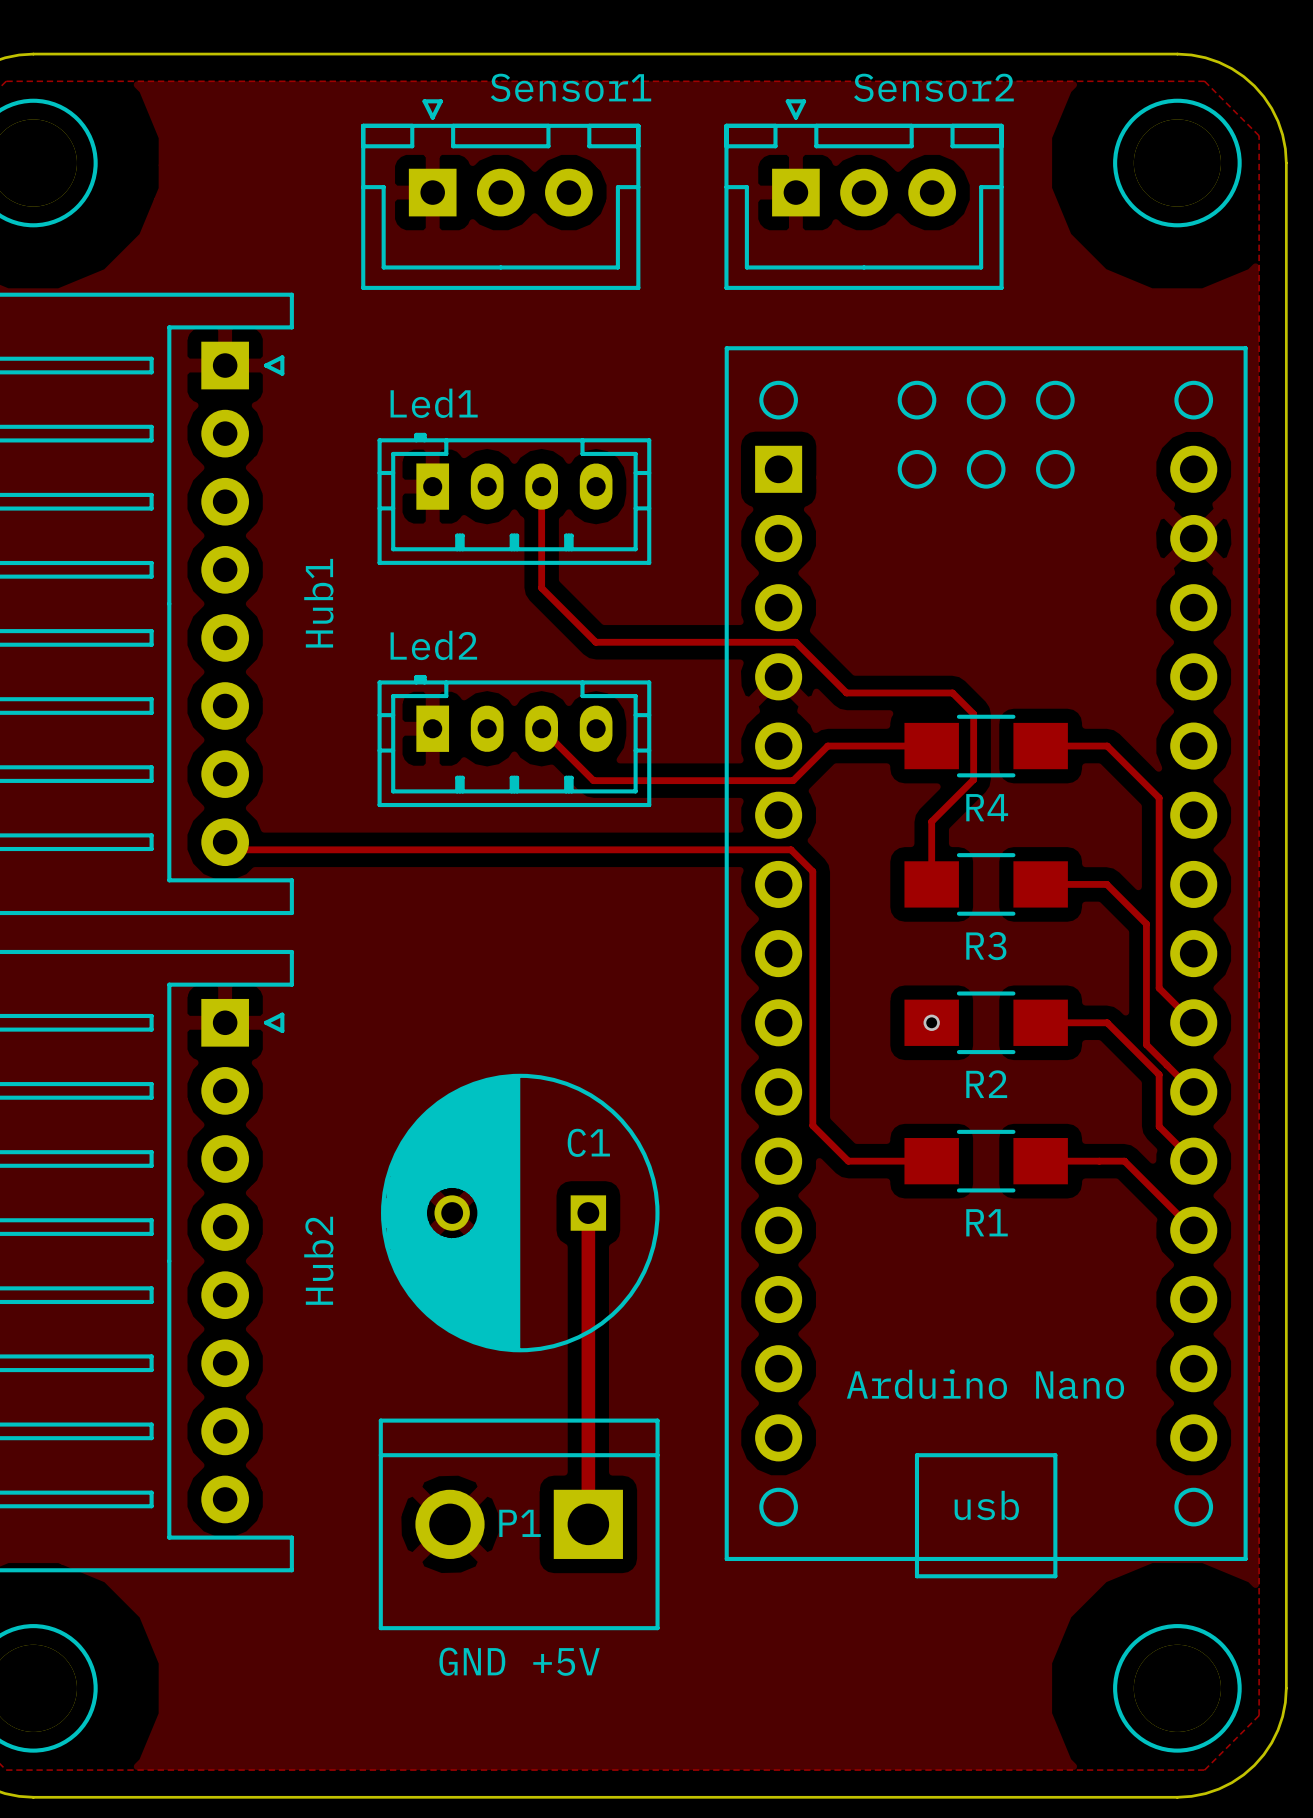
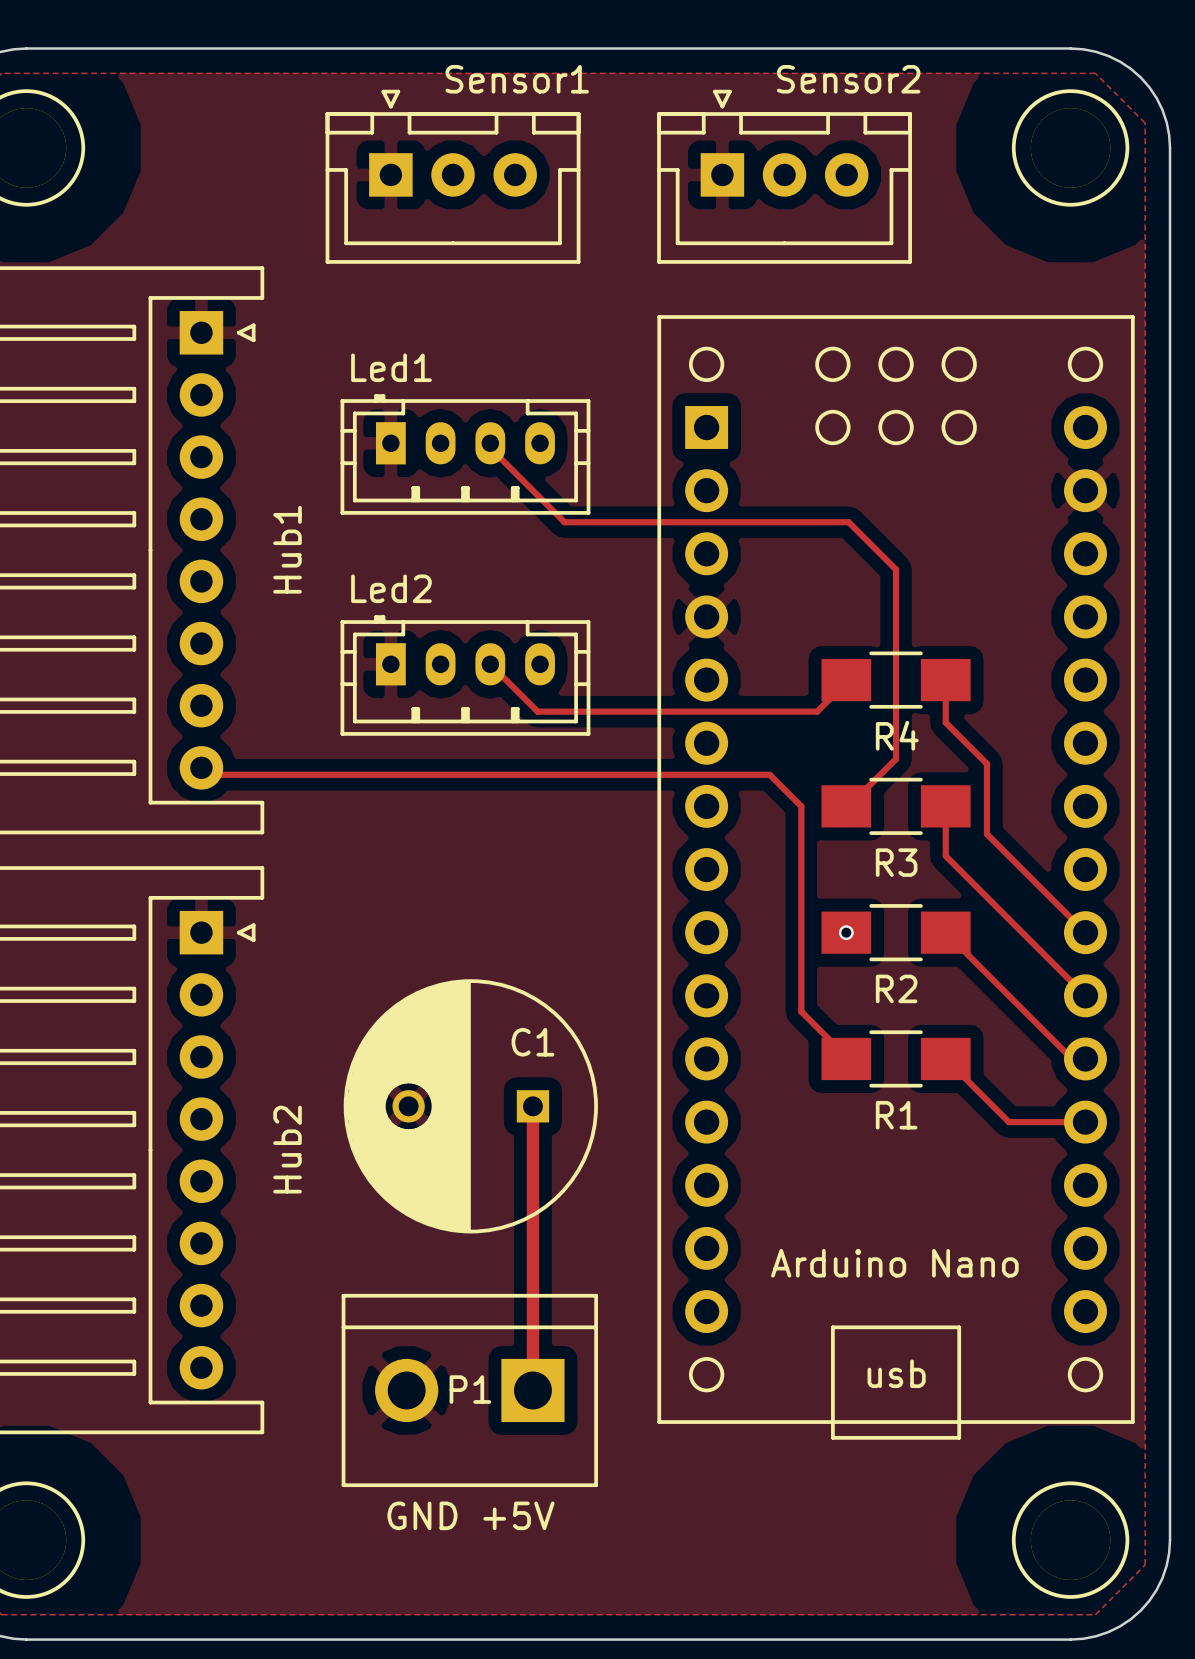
track: (541, 491) (541, 588) (595, 642) (795, 642) (846, 692) (952, 692) (973, 714) (973, 779) (931, 821) (931, 887) -> (490, 448) (564, 522) (848, 522) (896, 569) (896, 759) (846, 808)
track: (931, 746) (827, 746) (793, 780) -> (846, 680) (846, 682) (817, 711) (719, 711)
track: (1040, 746) (1107, 746) (1159, 797) (1159, 988) -> (945, 680) (945, 722) (986, 763) (986, 834) (1053, 901)
track: (791, 849) (812, 871) (812, 1125) (848, 1161) (931, 1161) -> (717, 774) (769, 774) (801, 806) (801, 1011) (846, 1056) (846, 1058)
track: (1040, 884) (1106, 884) (1146, 924) (1146, 1044) -> (945, 806) (945, 856) (1042, 952)
track: (1040, 1022) (1107, 1022) (1159, 1074) (1159, 1126) (1193, 1161) -> (945, 932) (1072, 1058) (1085, 1058)
track: (1040, 1161) (1124, 1161) (1193, 1230) -> (945, 1058) (1008, 1122) (1085, 1122)

